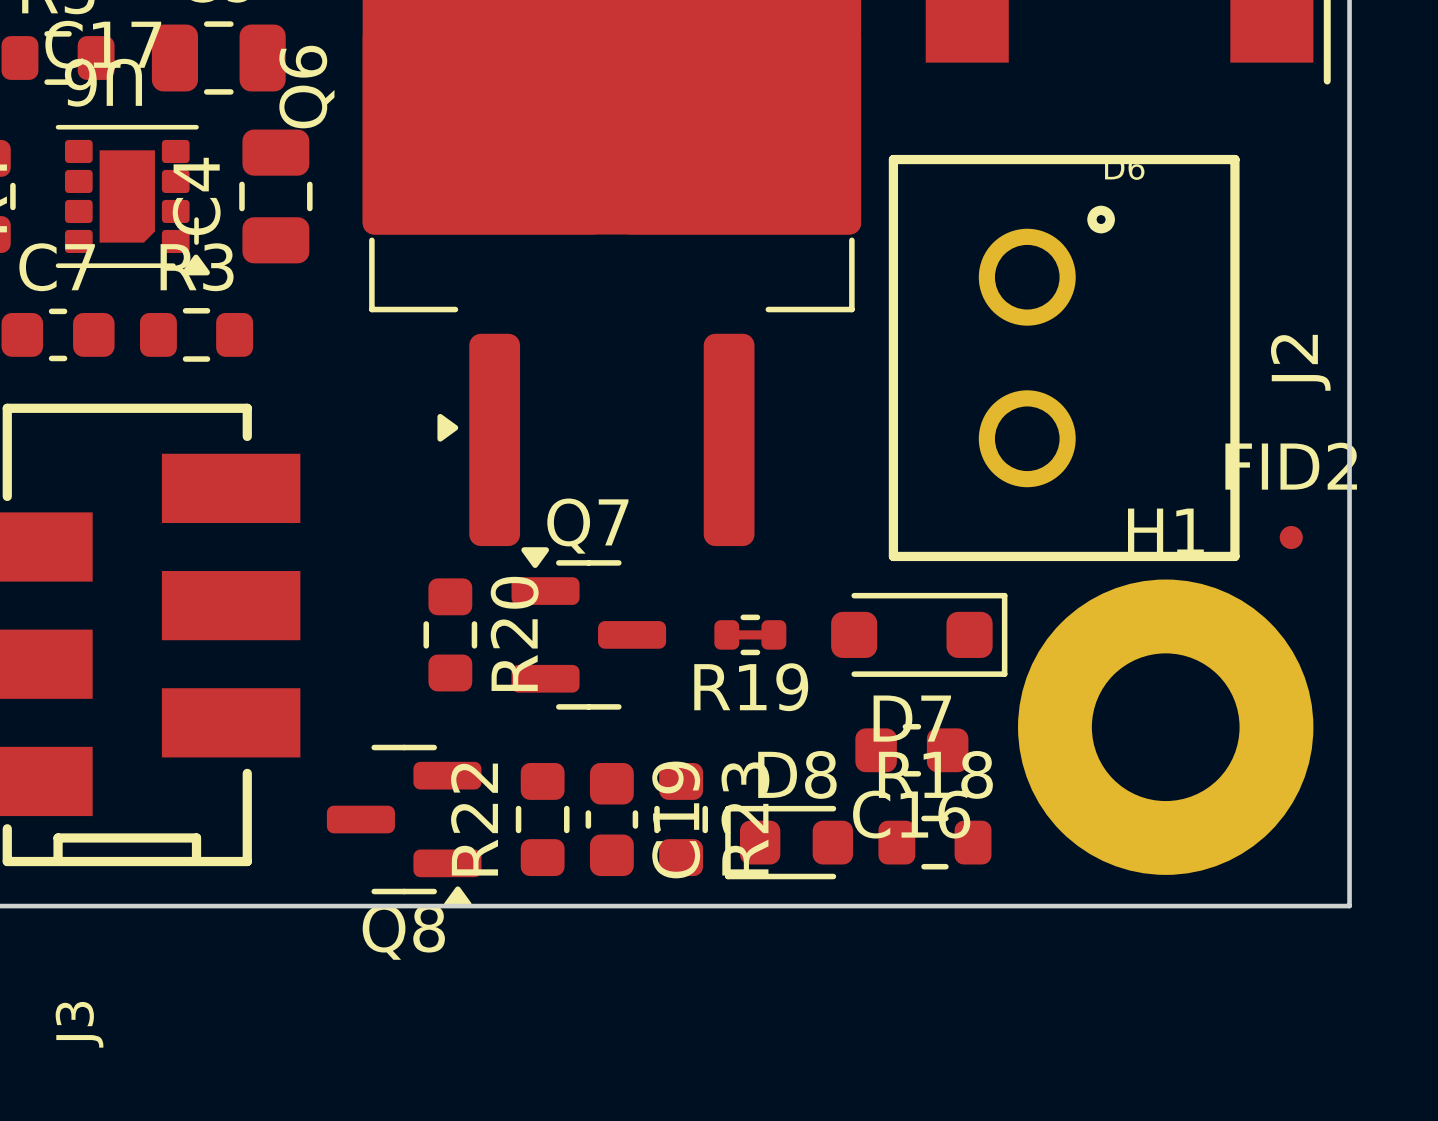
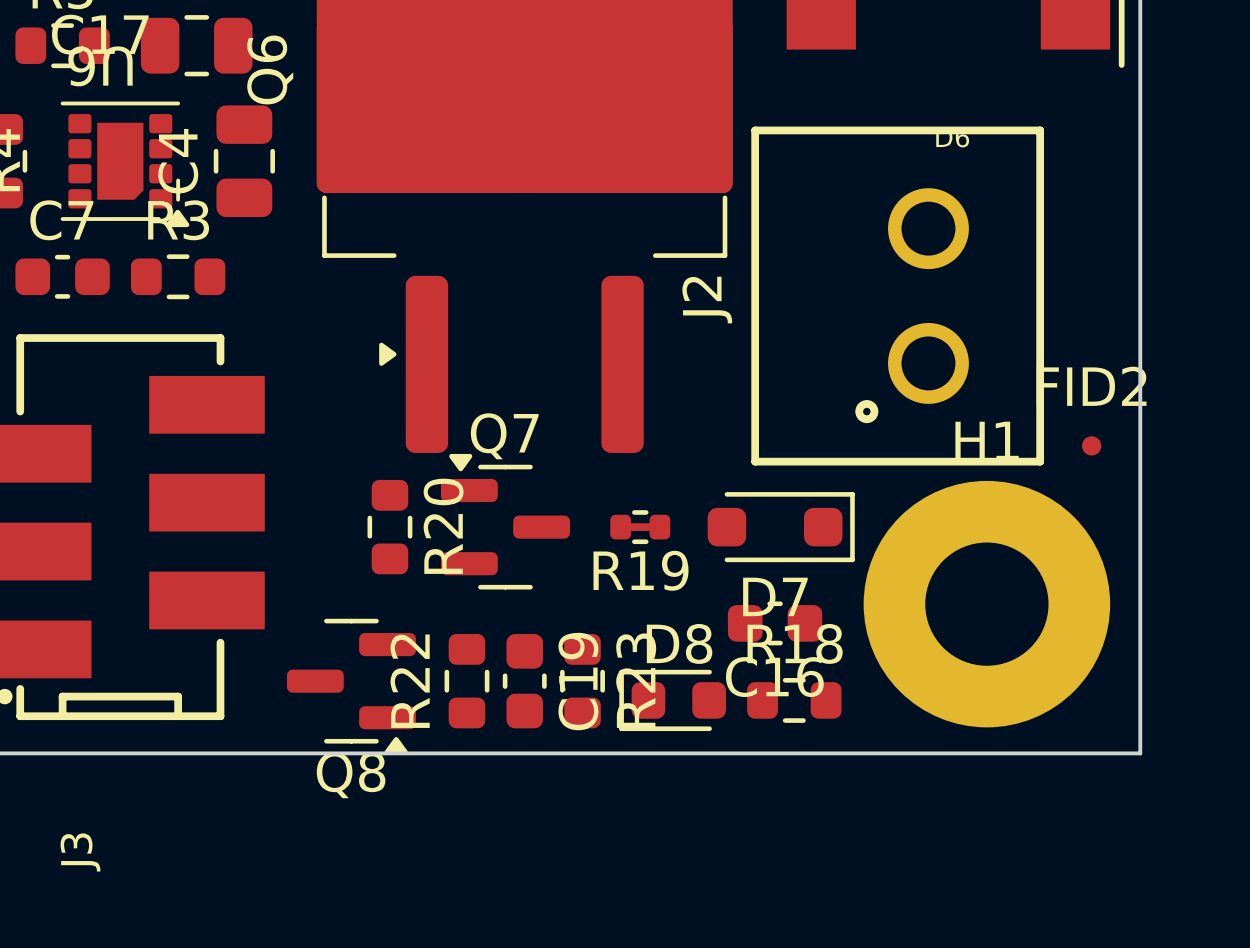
J2 rotation: 0° (1064, 357) -> 180° (897, 296)

